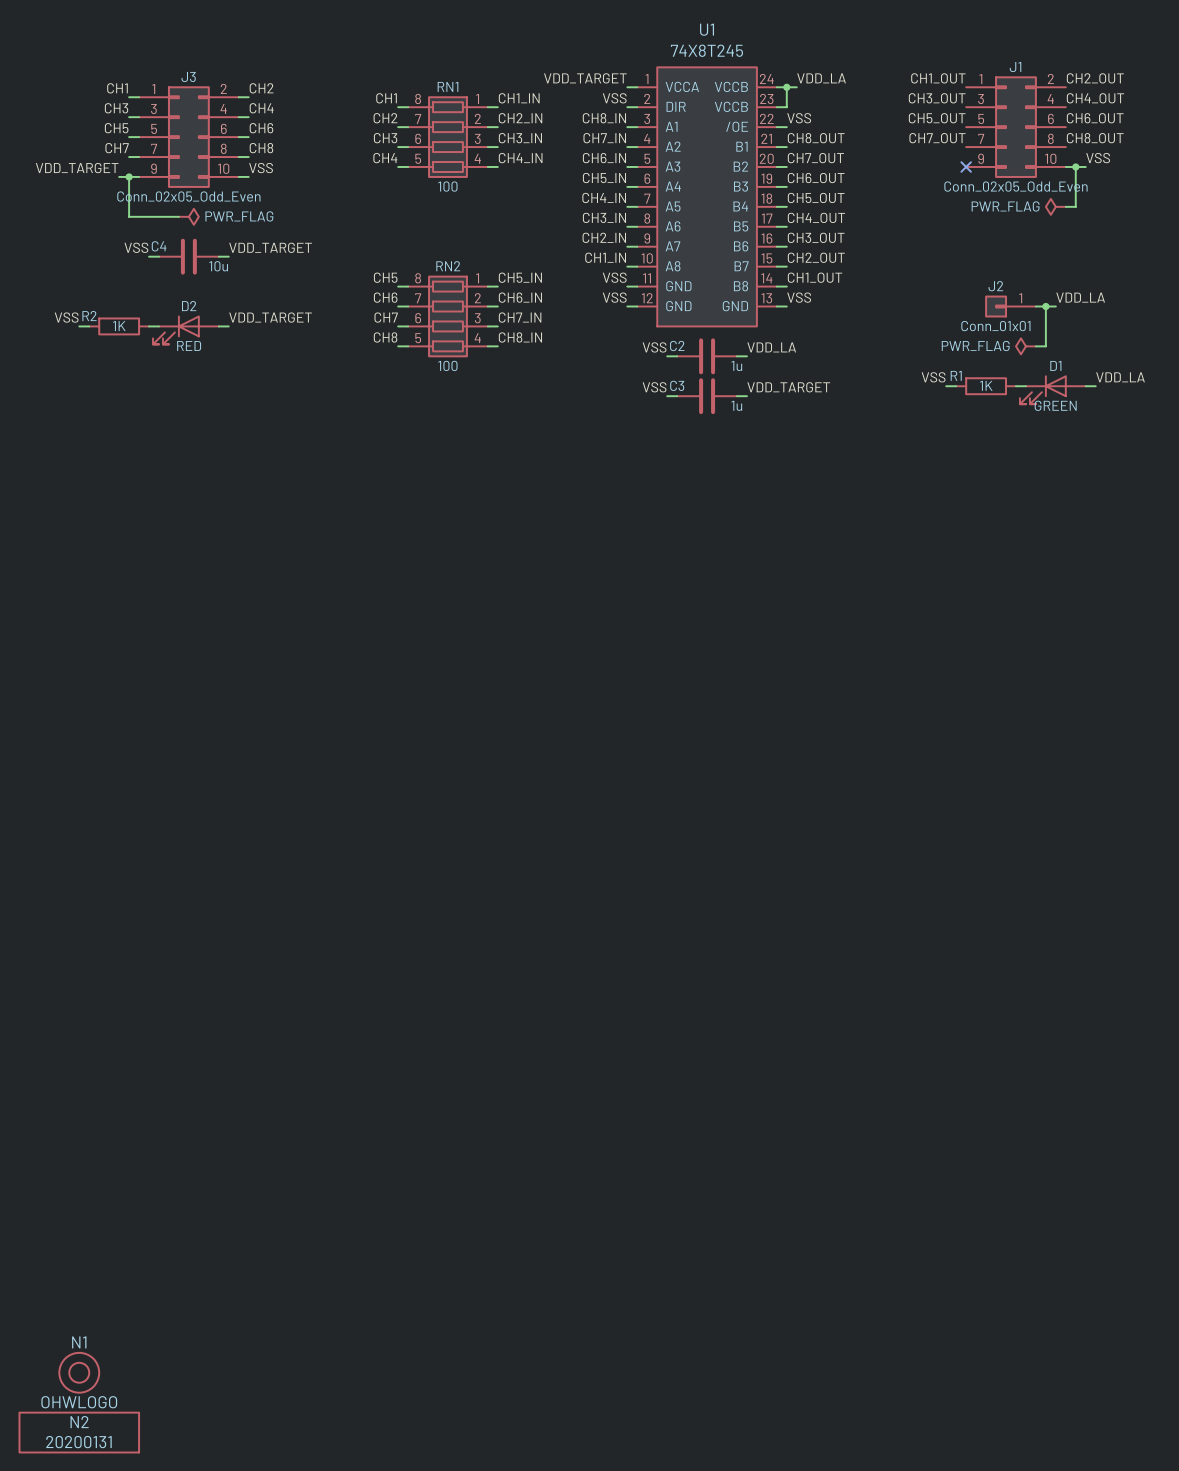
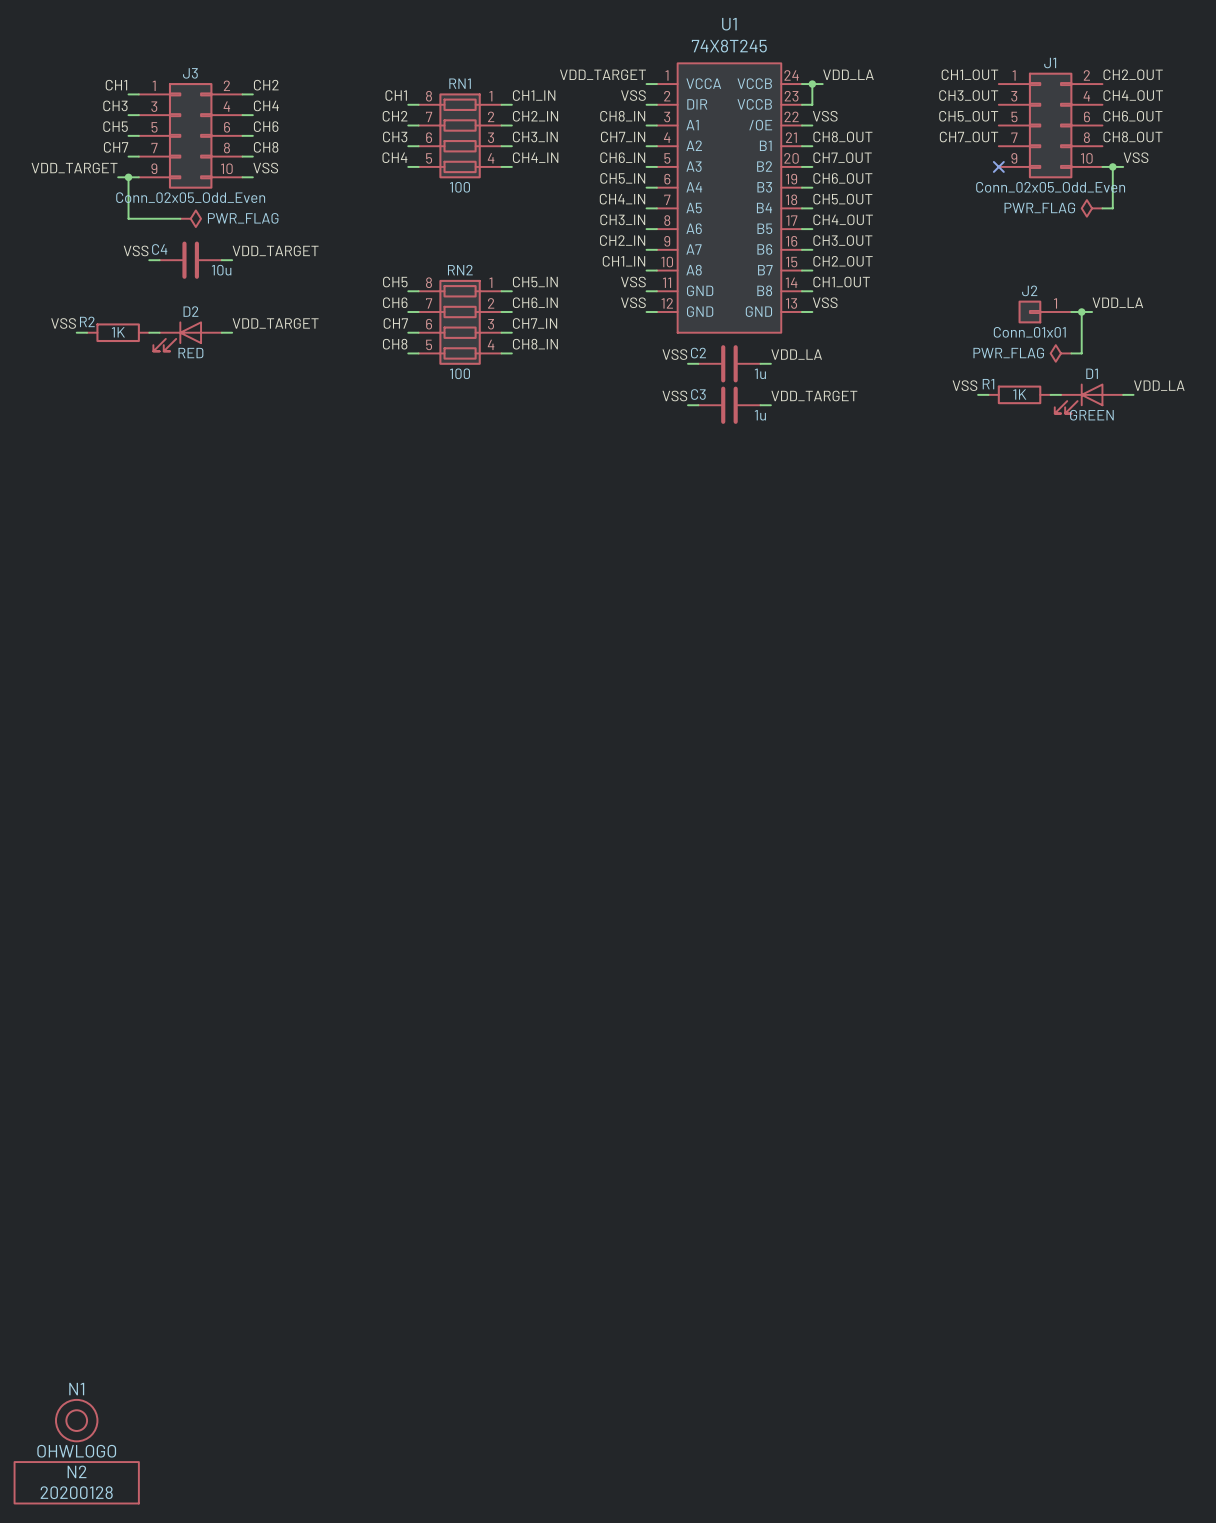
N2 value: 20200131 (78, 1442) -> 20200128 (76, 1492)

